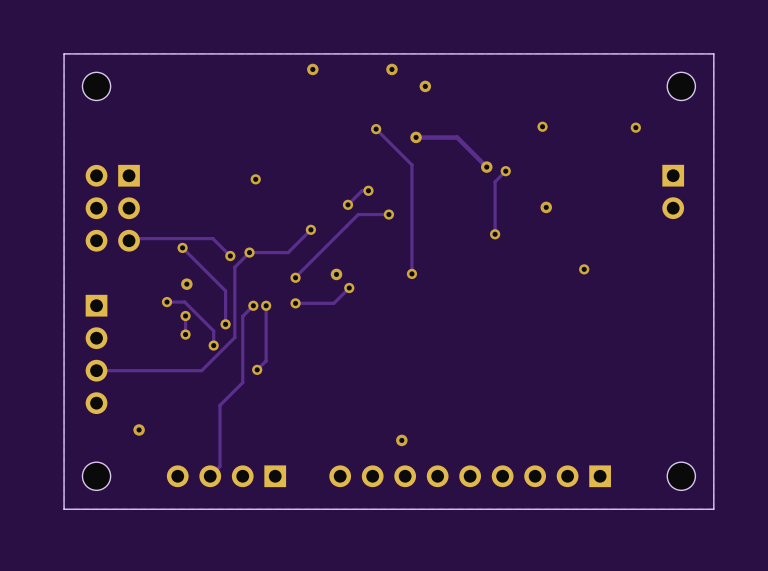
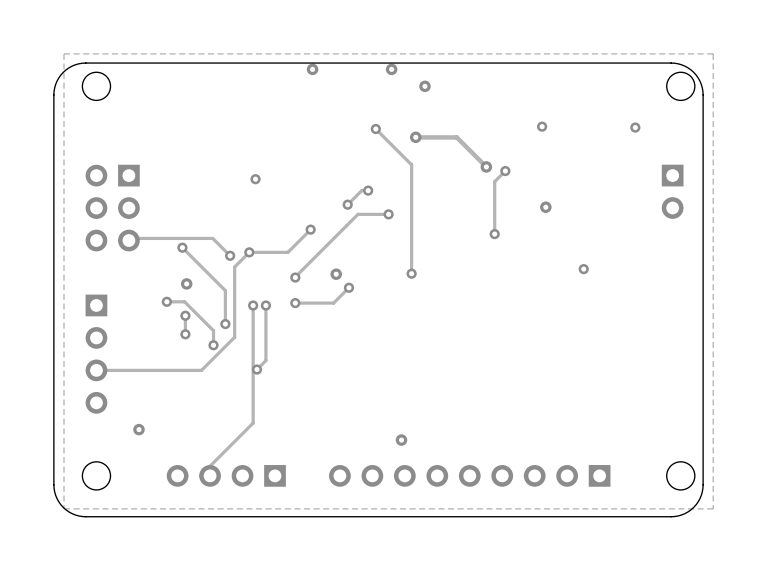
board edge: (713, 53) (64, 53) (64, 509) (713, 509) (713, 53) -> (671, 63) (681, 64) (693, 72) (701, 84) (703, 94) (703, 484) (699, 498) (691, 509) (681, 514) (671, 516) (85, 516) (71, 513) (60, 504) (55, 495) (53, 484) (53, 94) (57, 81) (65, 70) (75, 64) (85, 63) (671, 63)
track: (253, 305) (242, 316) (242, 382) (219, 405) (219, 466) (210, 476) -> (253, 305) (253, 423) (200, 475)

